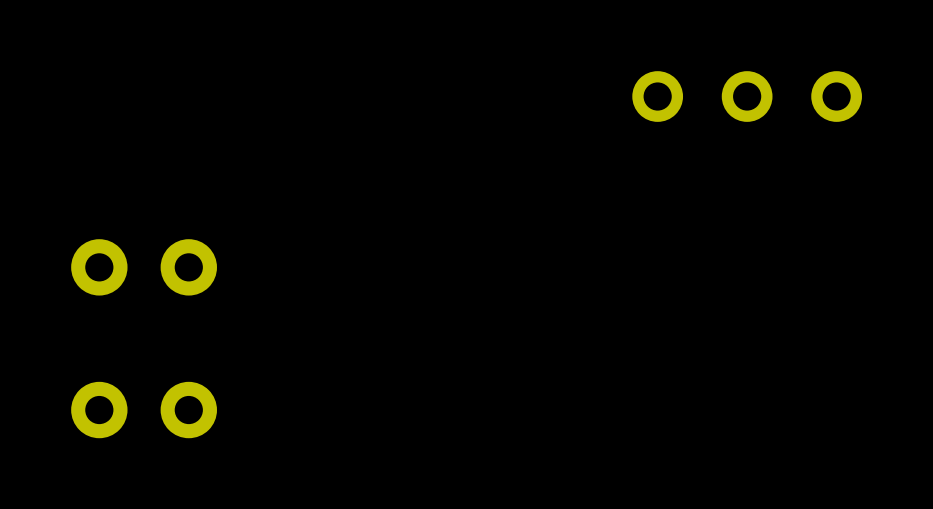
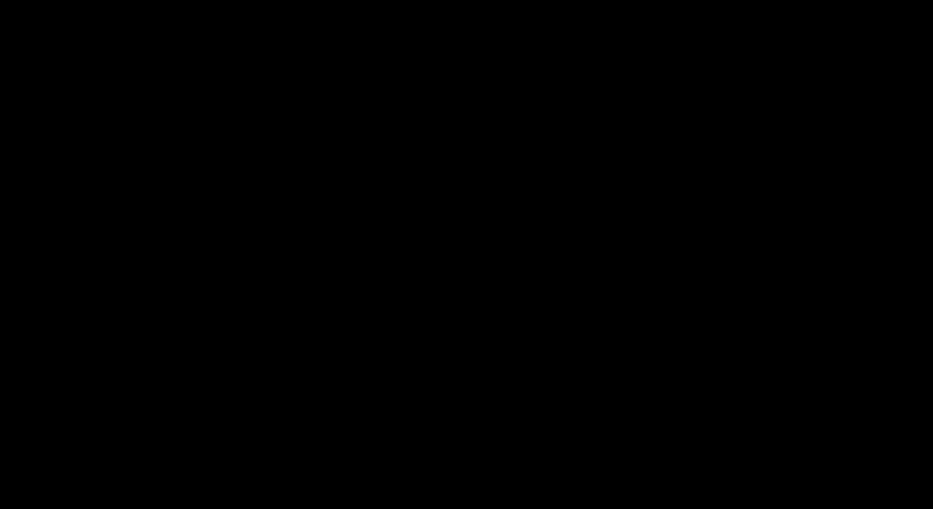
part: (747, 96) -> none
part: (144, 267) -> none
part: (144, 410) -> none

